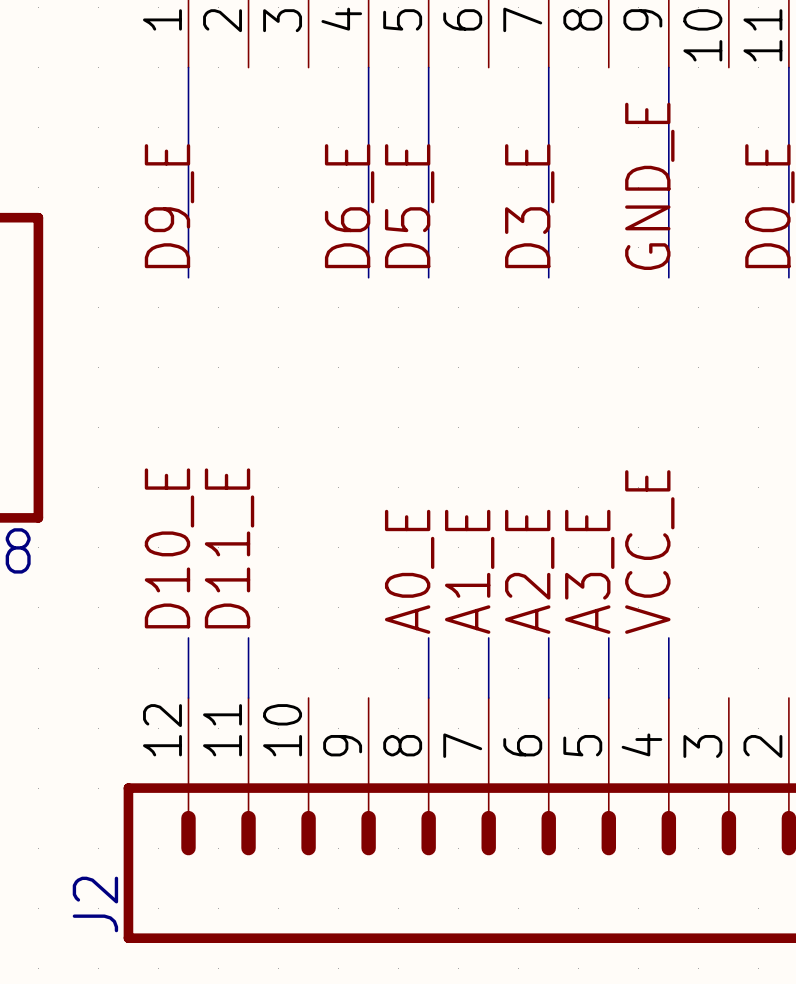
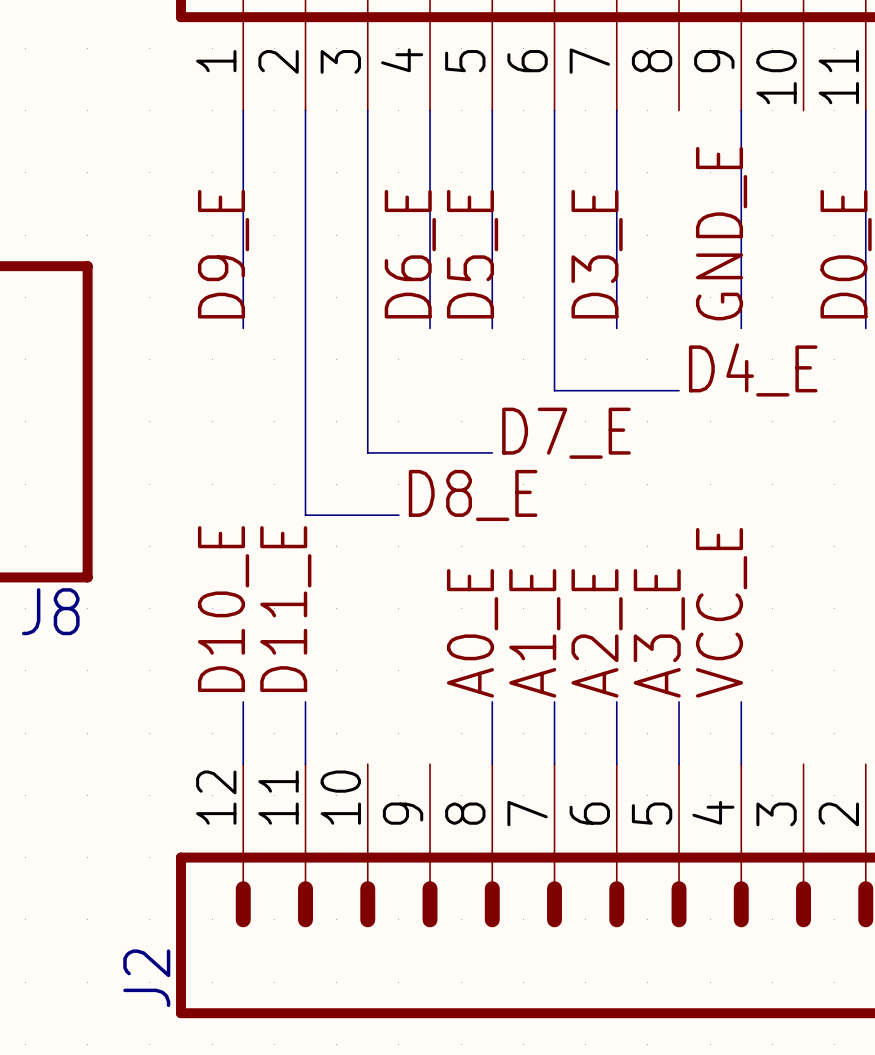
wire: none -> (305, 110) (305, 515) (398, 515)
wire: none -> (367, 110) (367, 452) (492, 452)
wire: none -> (554, 110) (554, 390) (679, 390)
label: none -> D4_E (753, 369)
label: none -> D7_E (566, 433)
label: none -> D8_E (473, 495)

